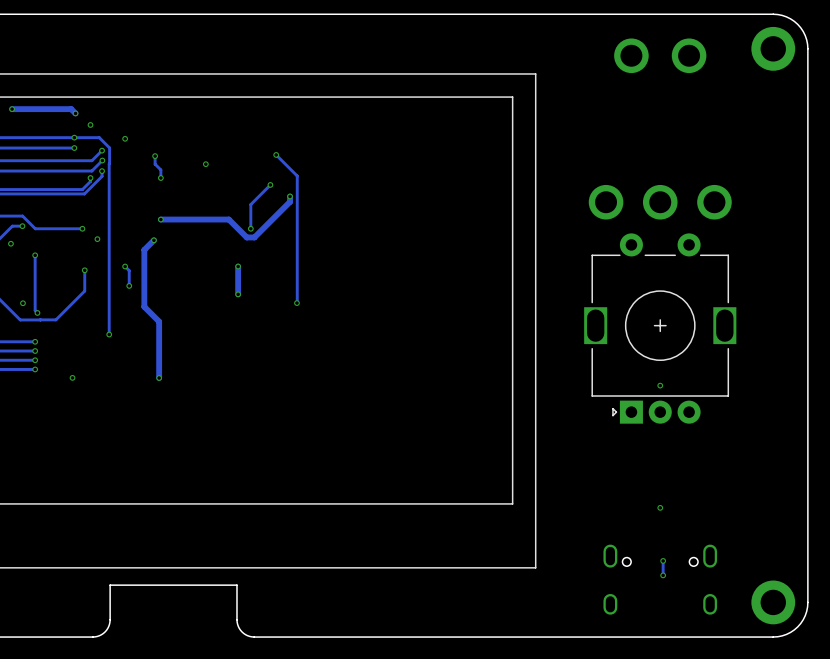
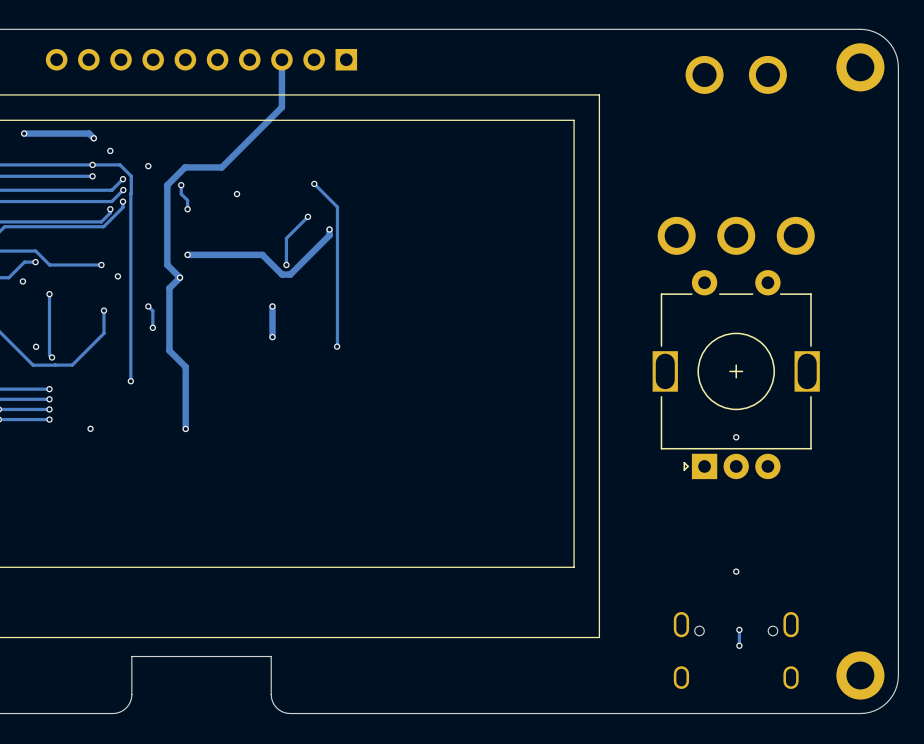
part: none -> (201, 59)
track: none -> (281, 59) (281, 107) (221, 167) (185, 167) (167, 185) (167, 264) (180, 277)

